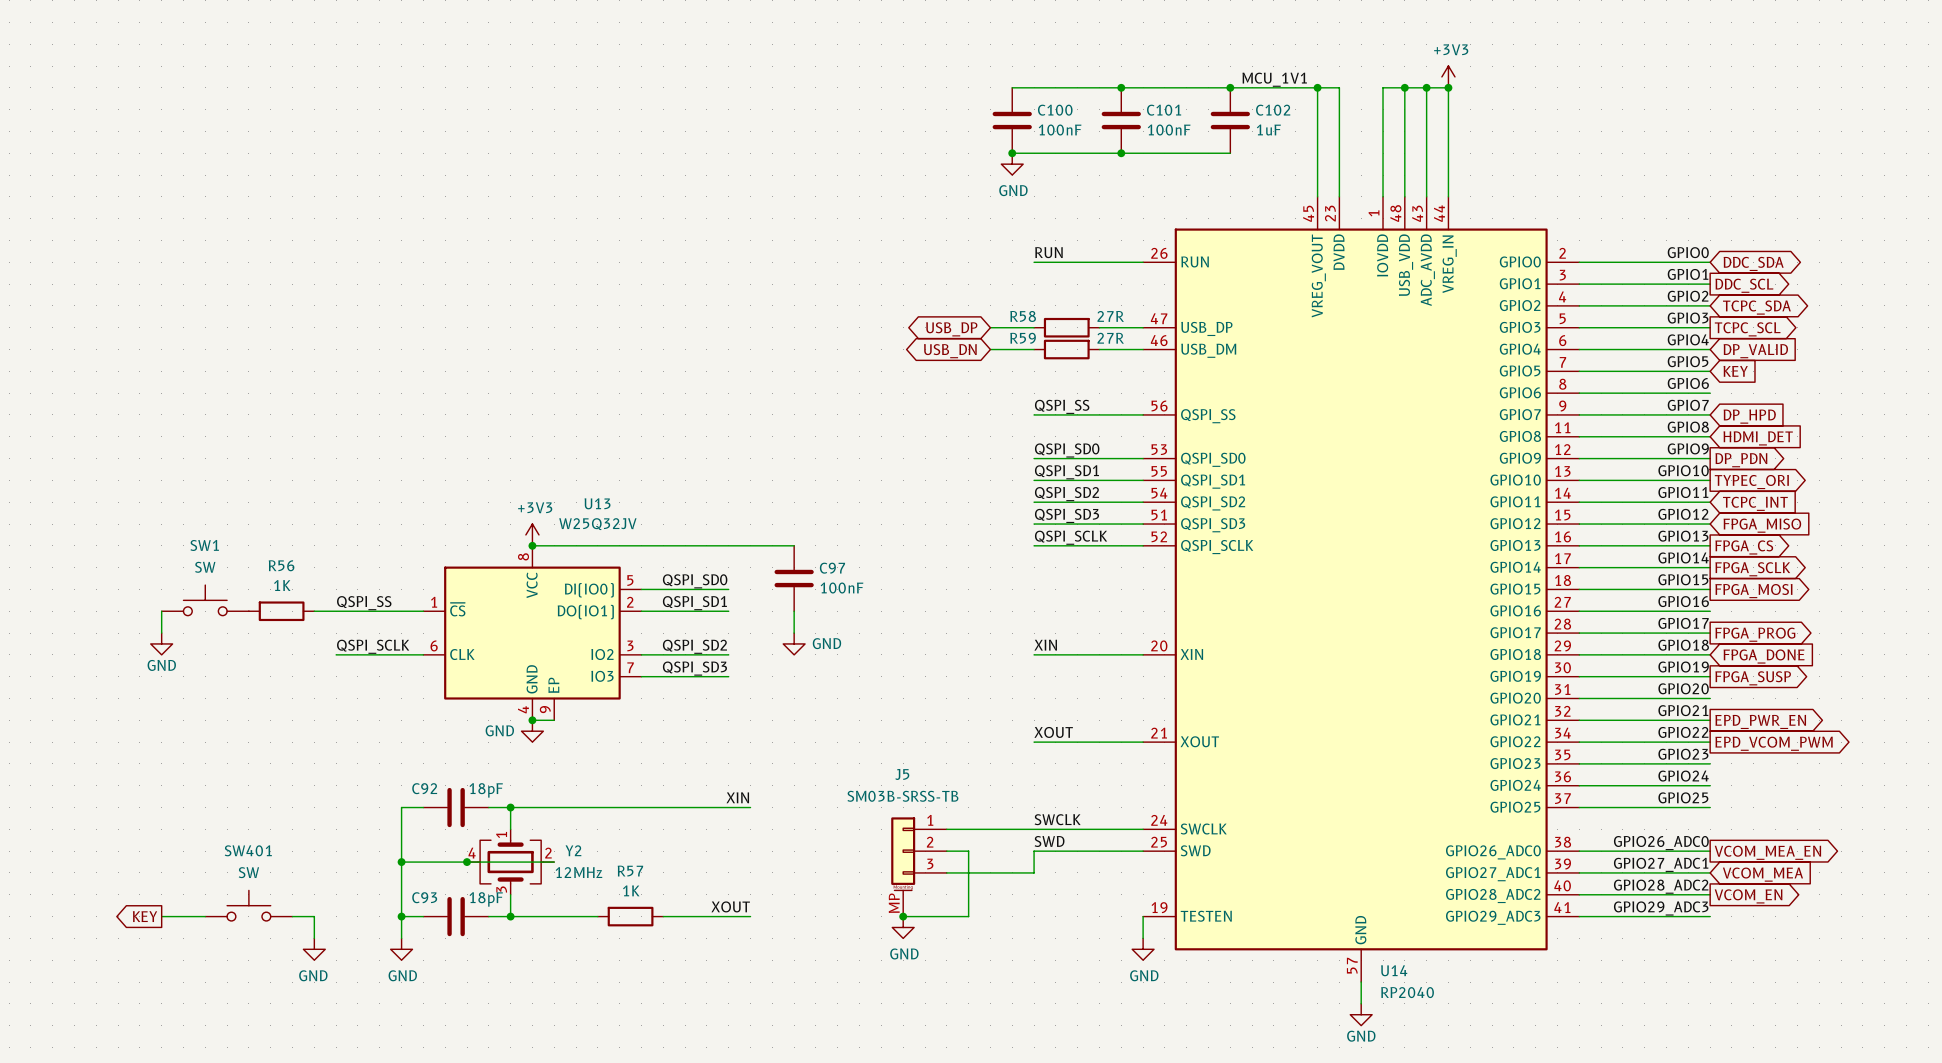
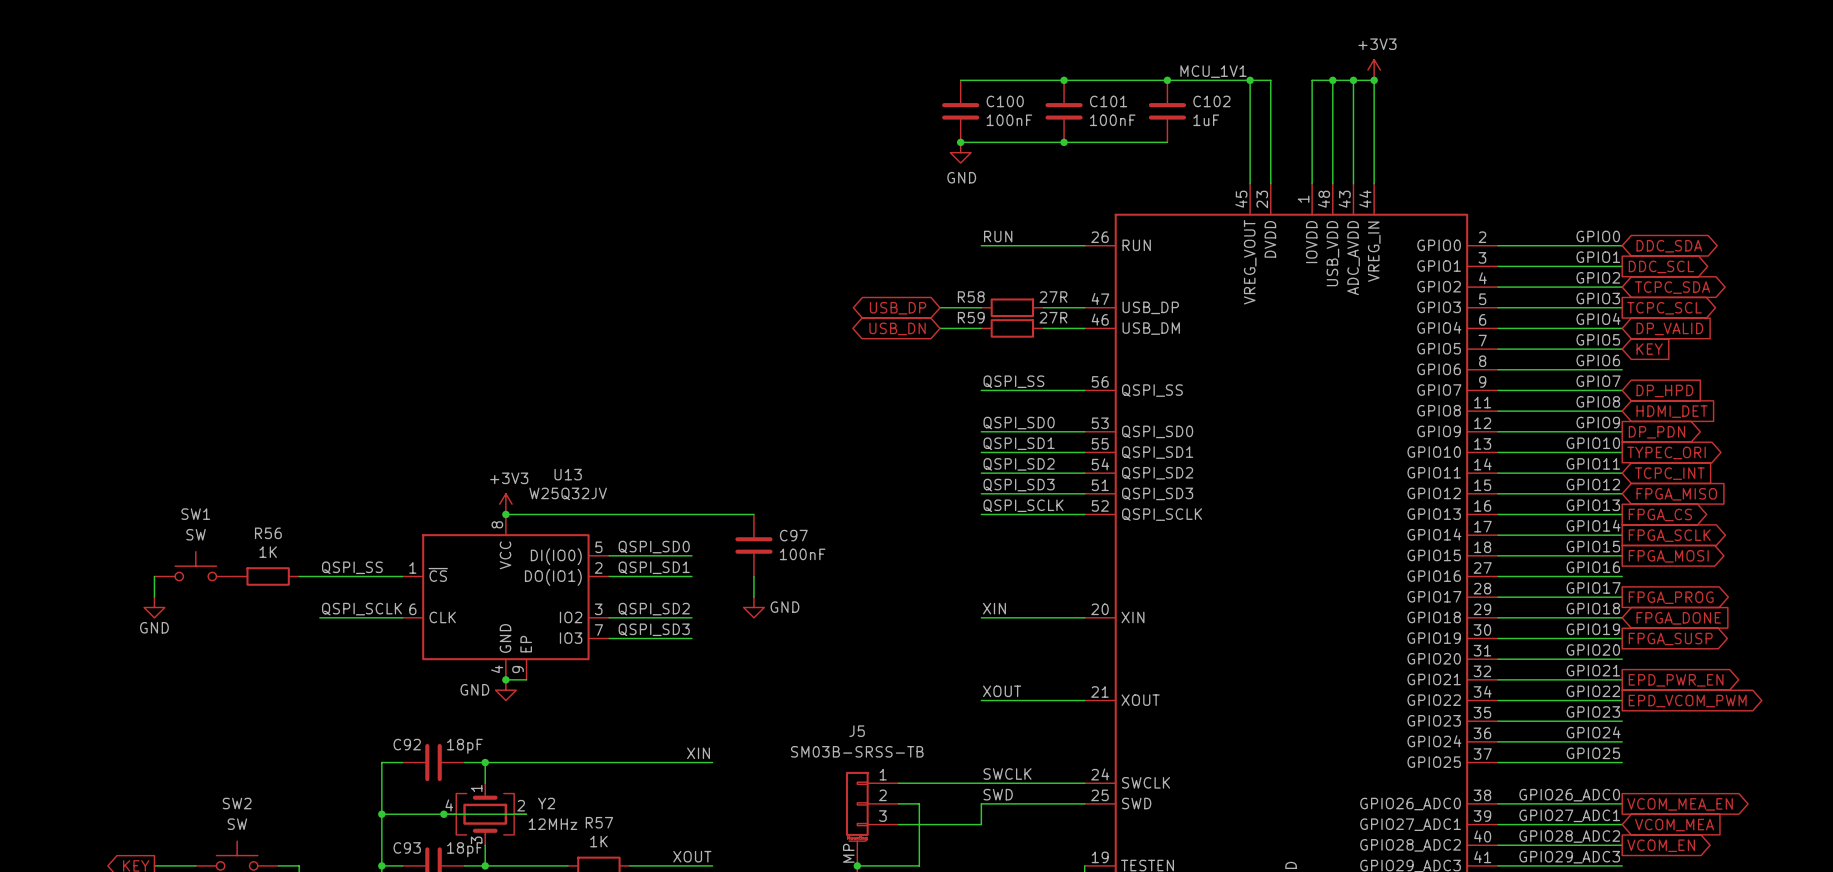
SW401 name: SW401 (248, 850) -> SW2 (237, 803)

